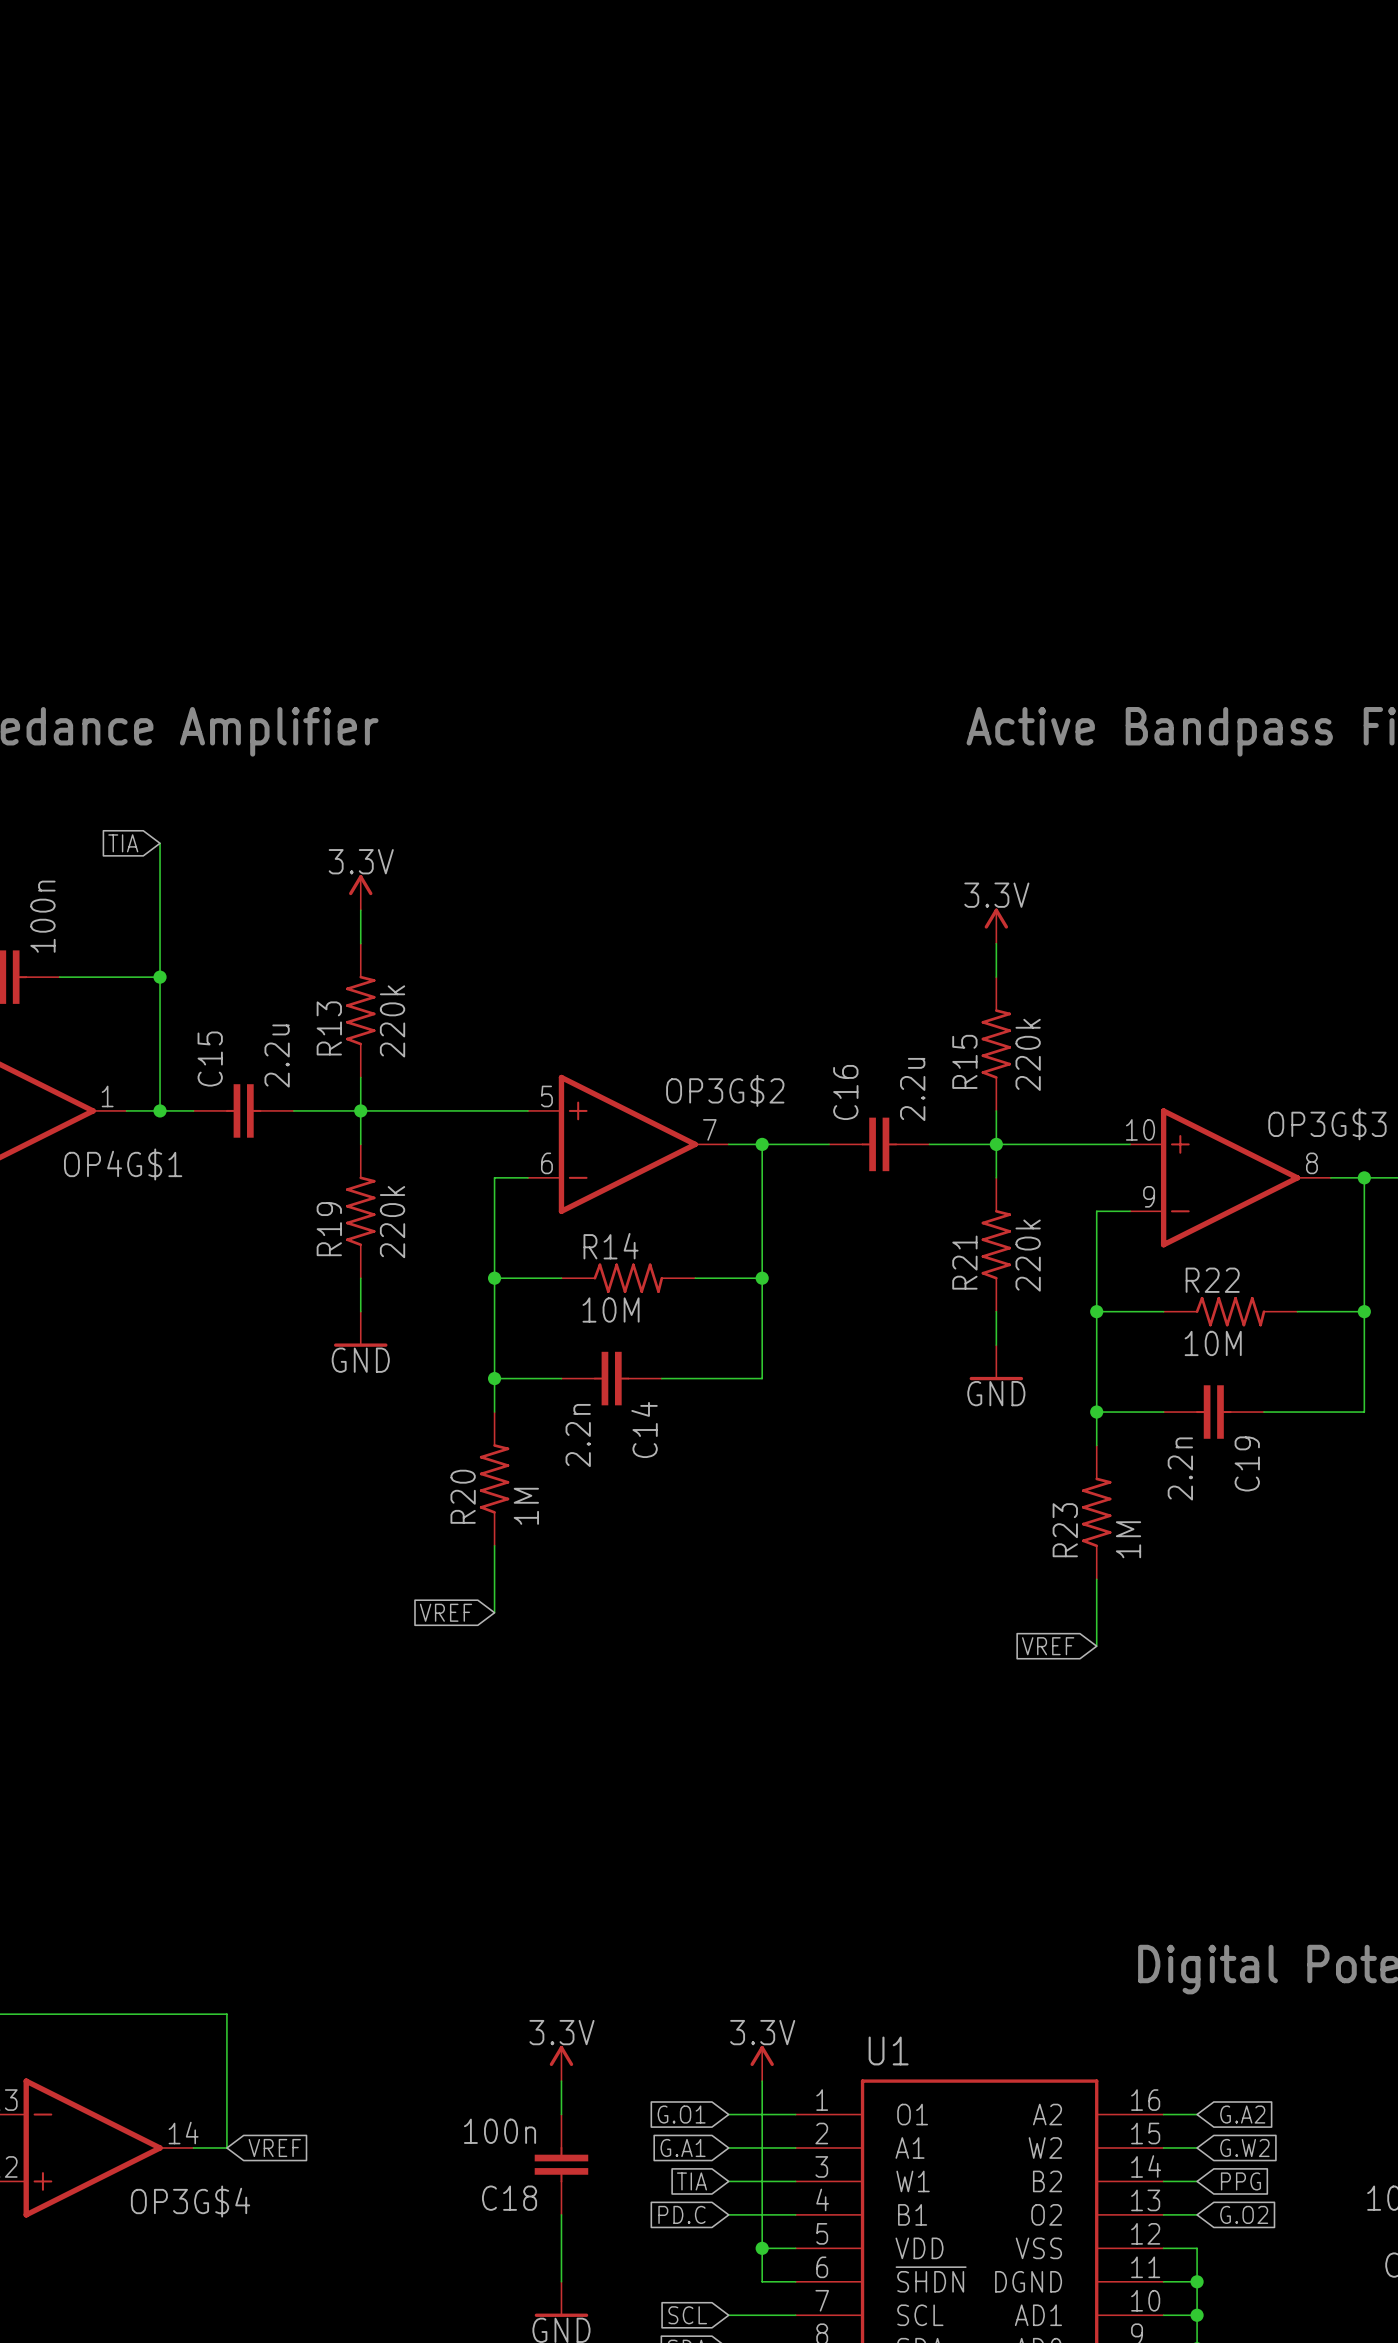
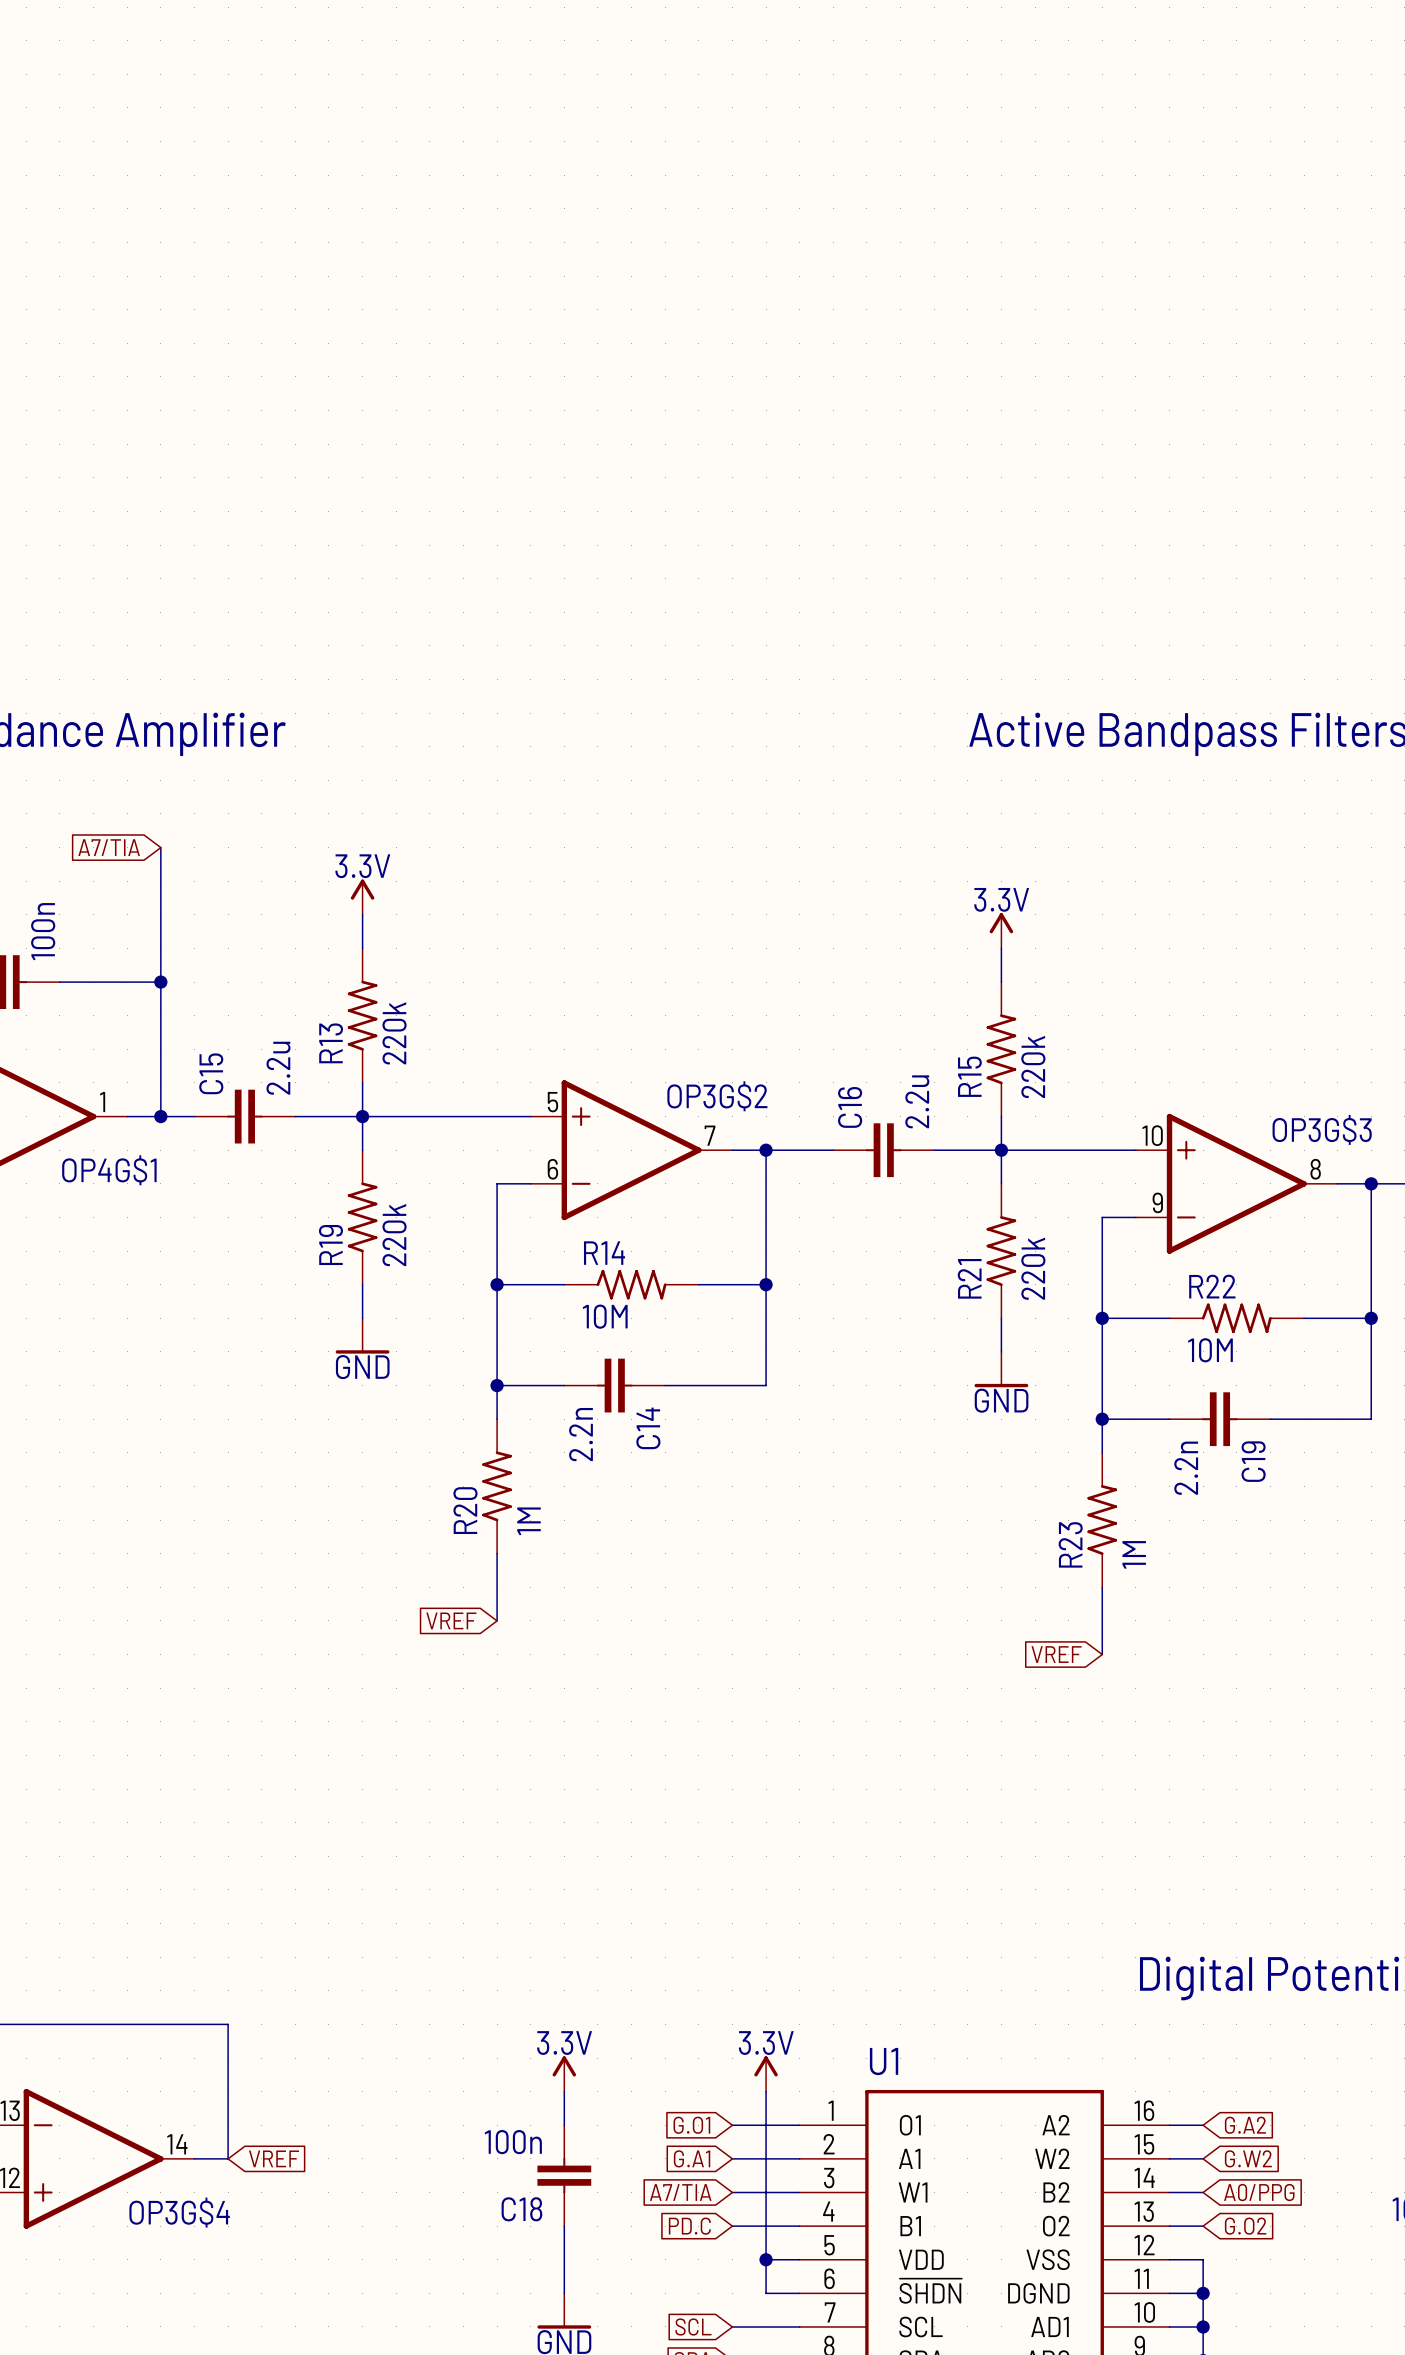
global label: TIA (123, 843) -> A7/TIA (109, 847)
global label: TIA (692, 2181) -> A7/TIA (680, 2192)
global label: PPG (1240, 2181) -> A0/PPG (1259, 2192)

